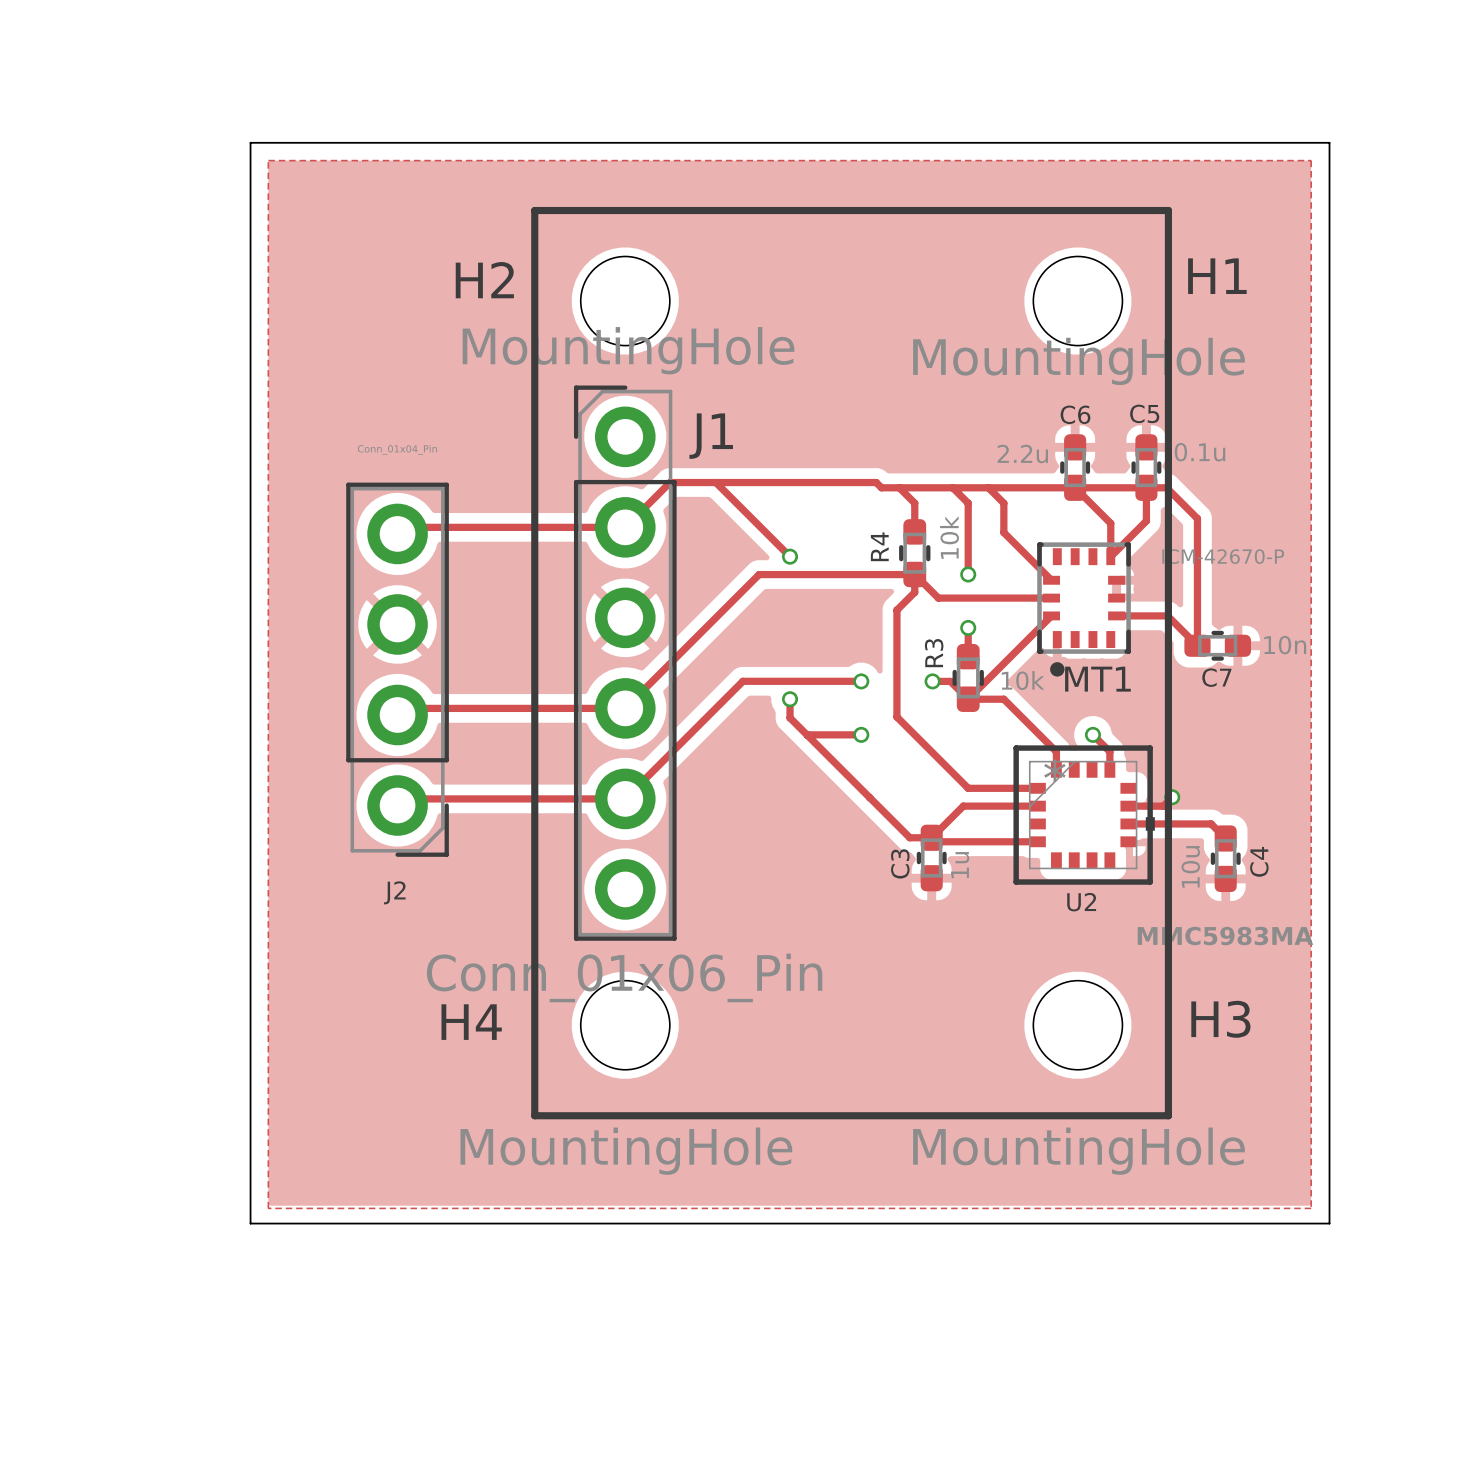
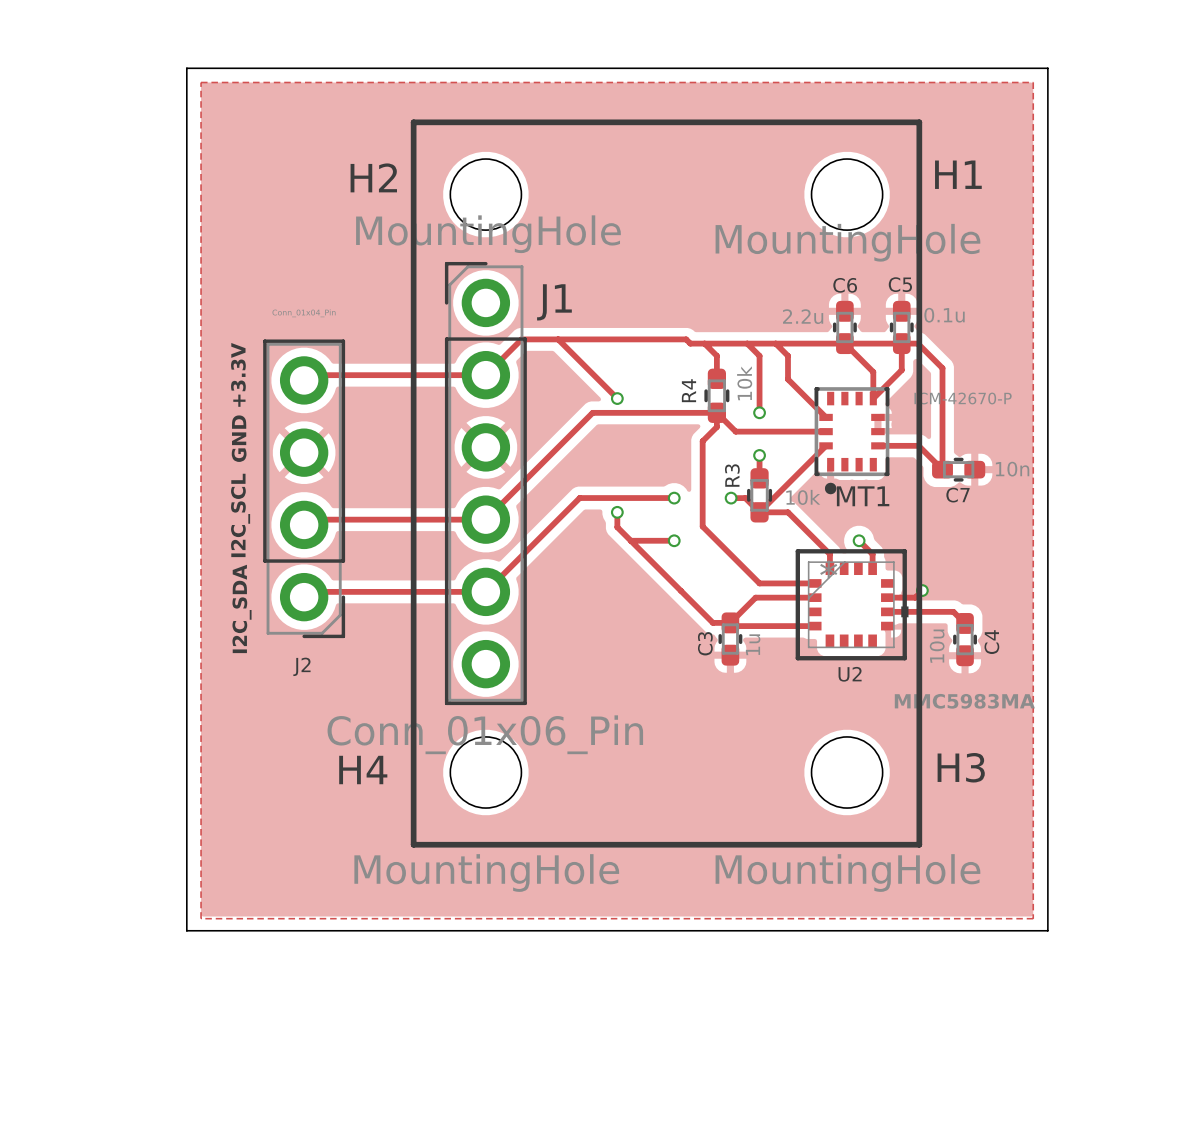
text: none -> +3.3V (238, 374)
text: none -> GND (239, 438)
text: none -> I2C_SCL (240, 515)
text: none -> I2C_SDA (242, 608)

